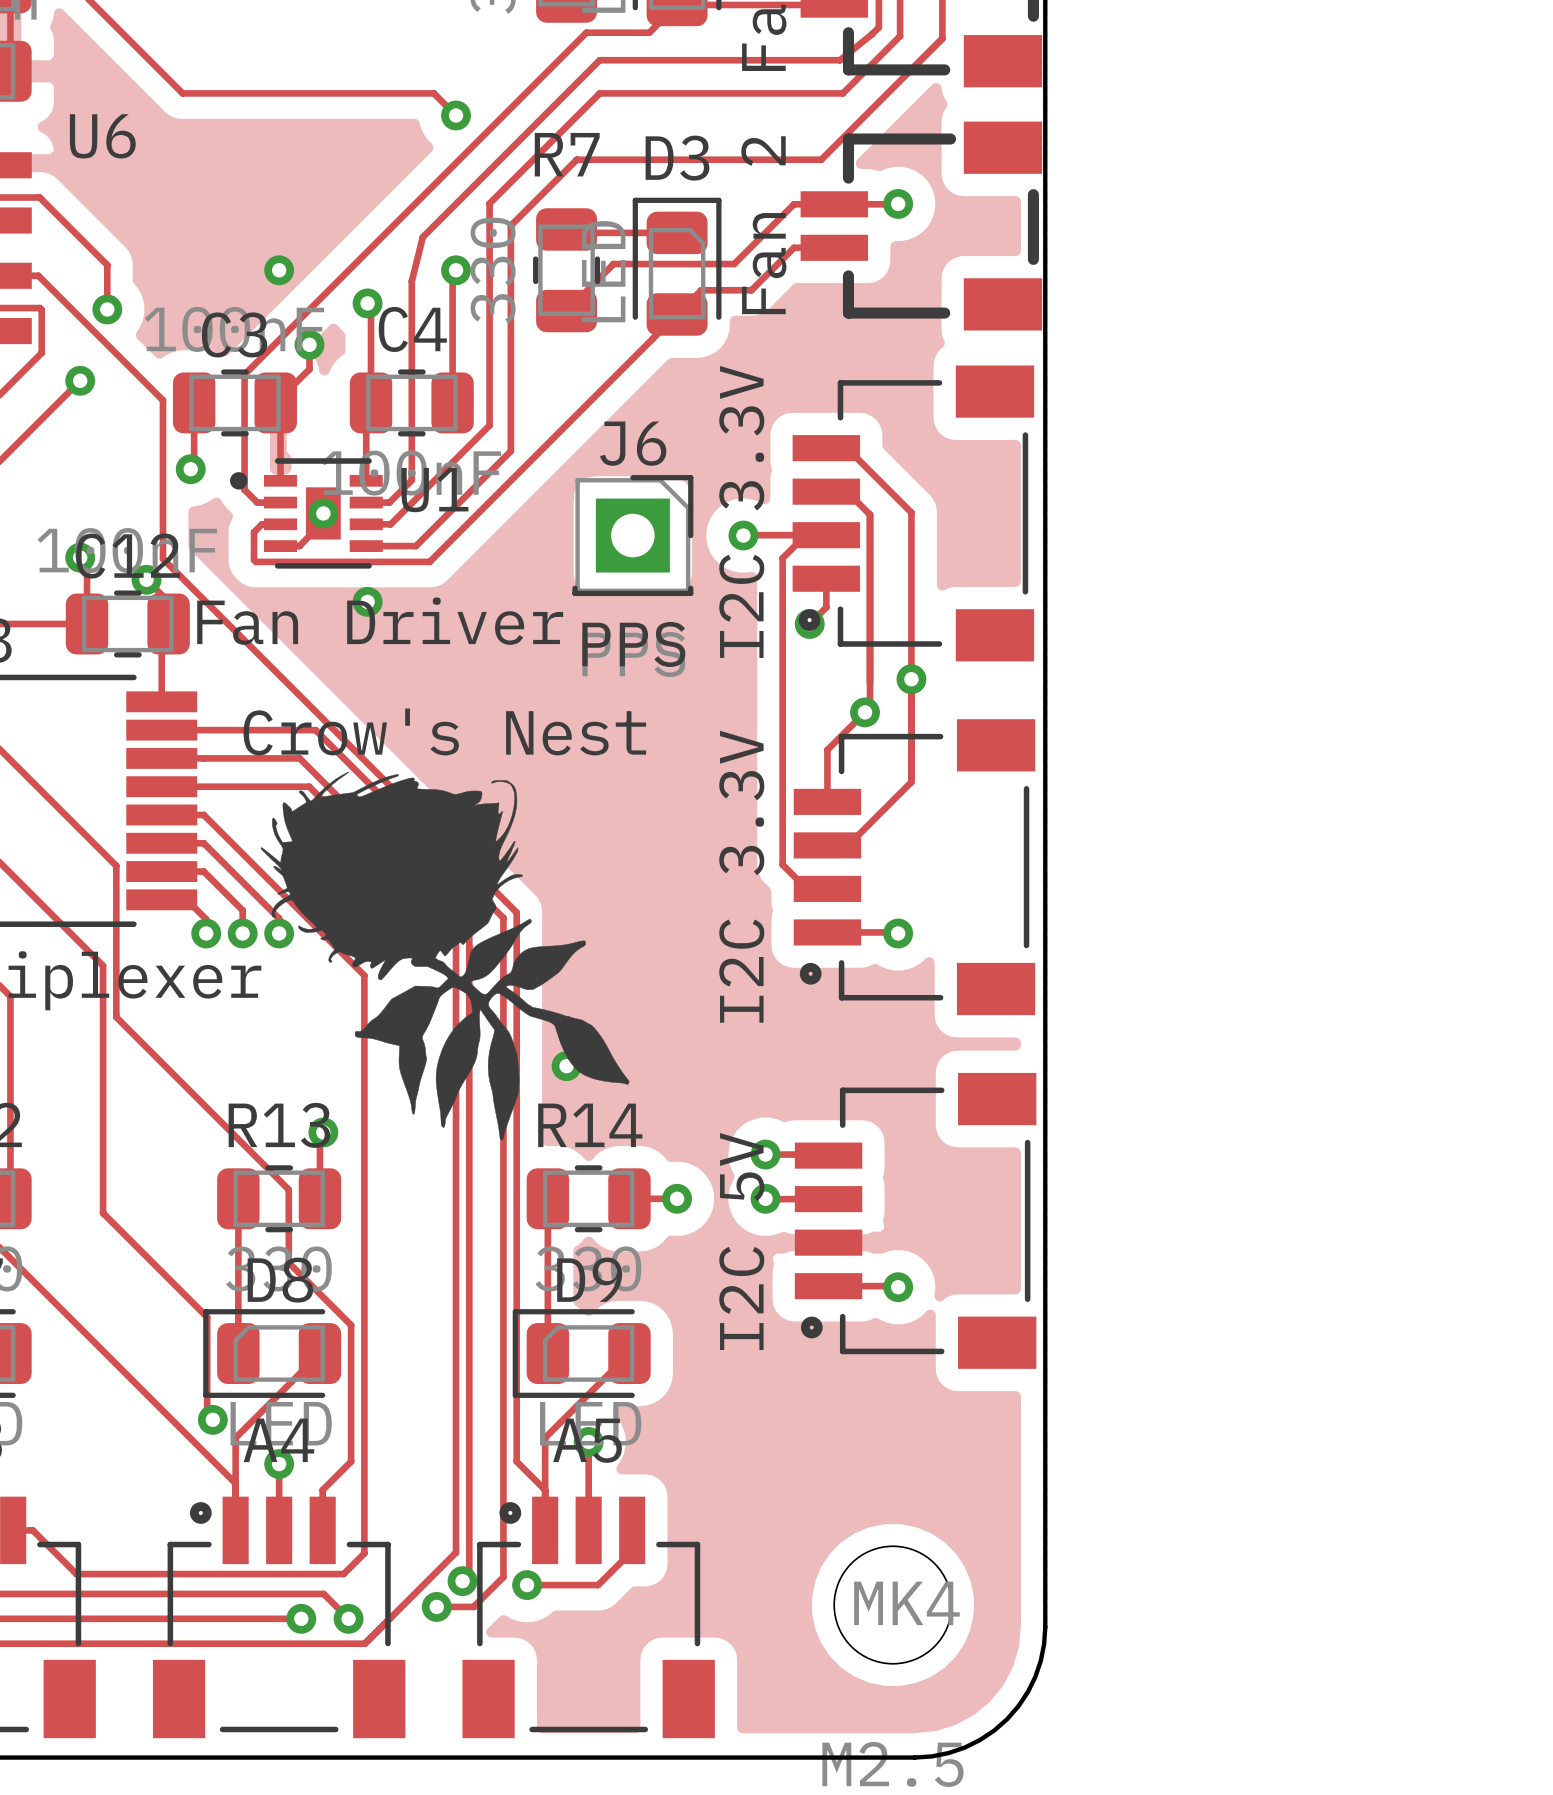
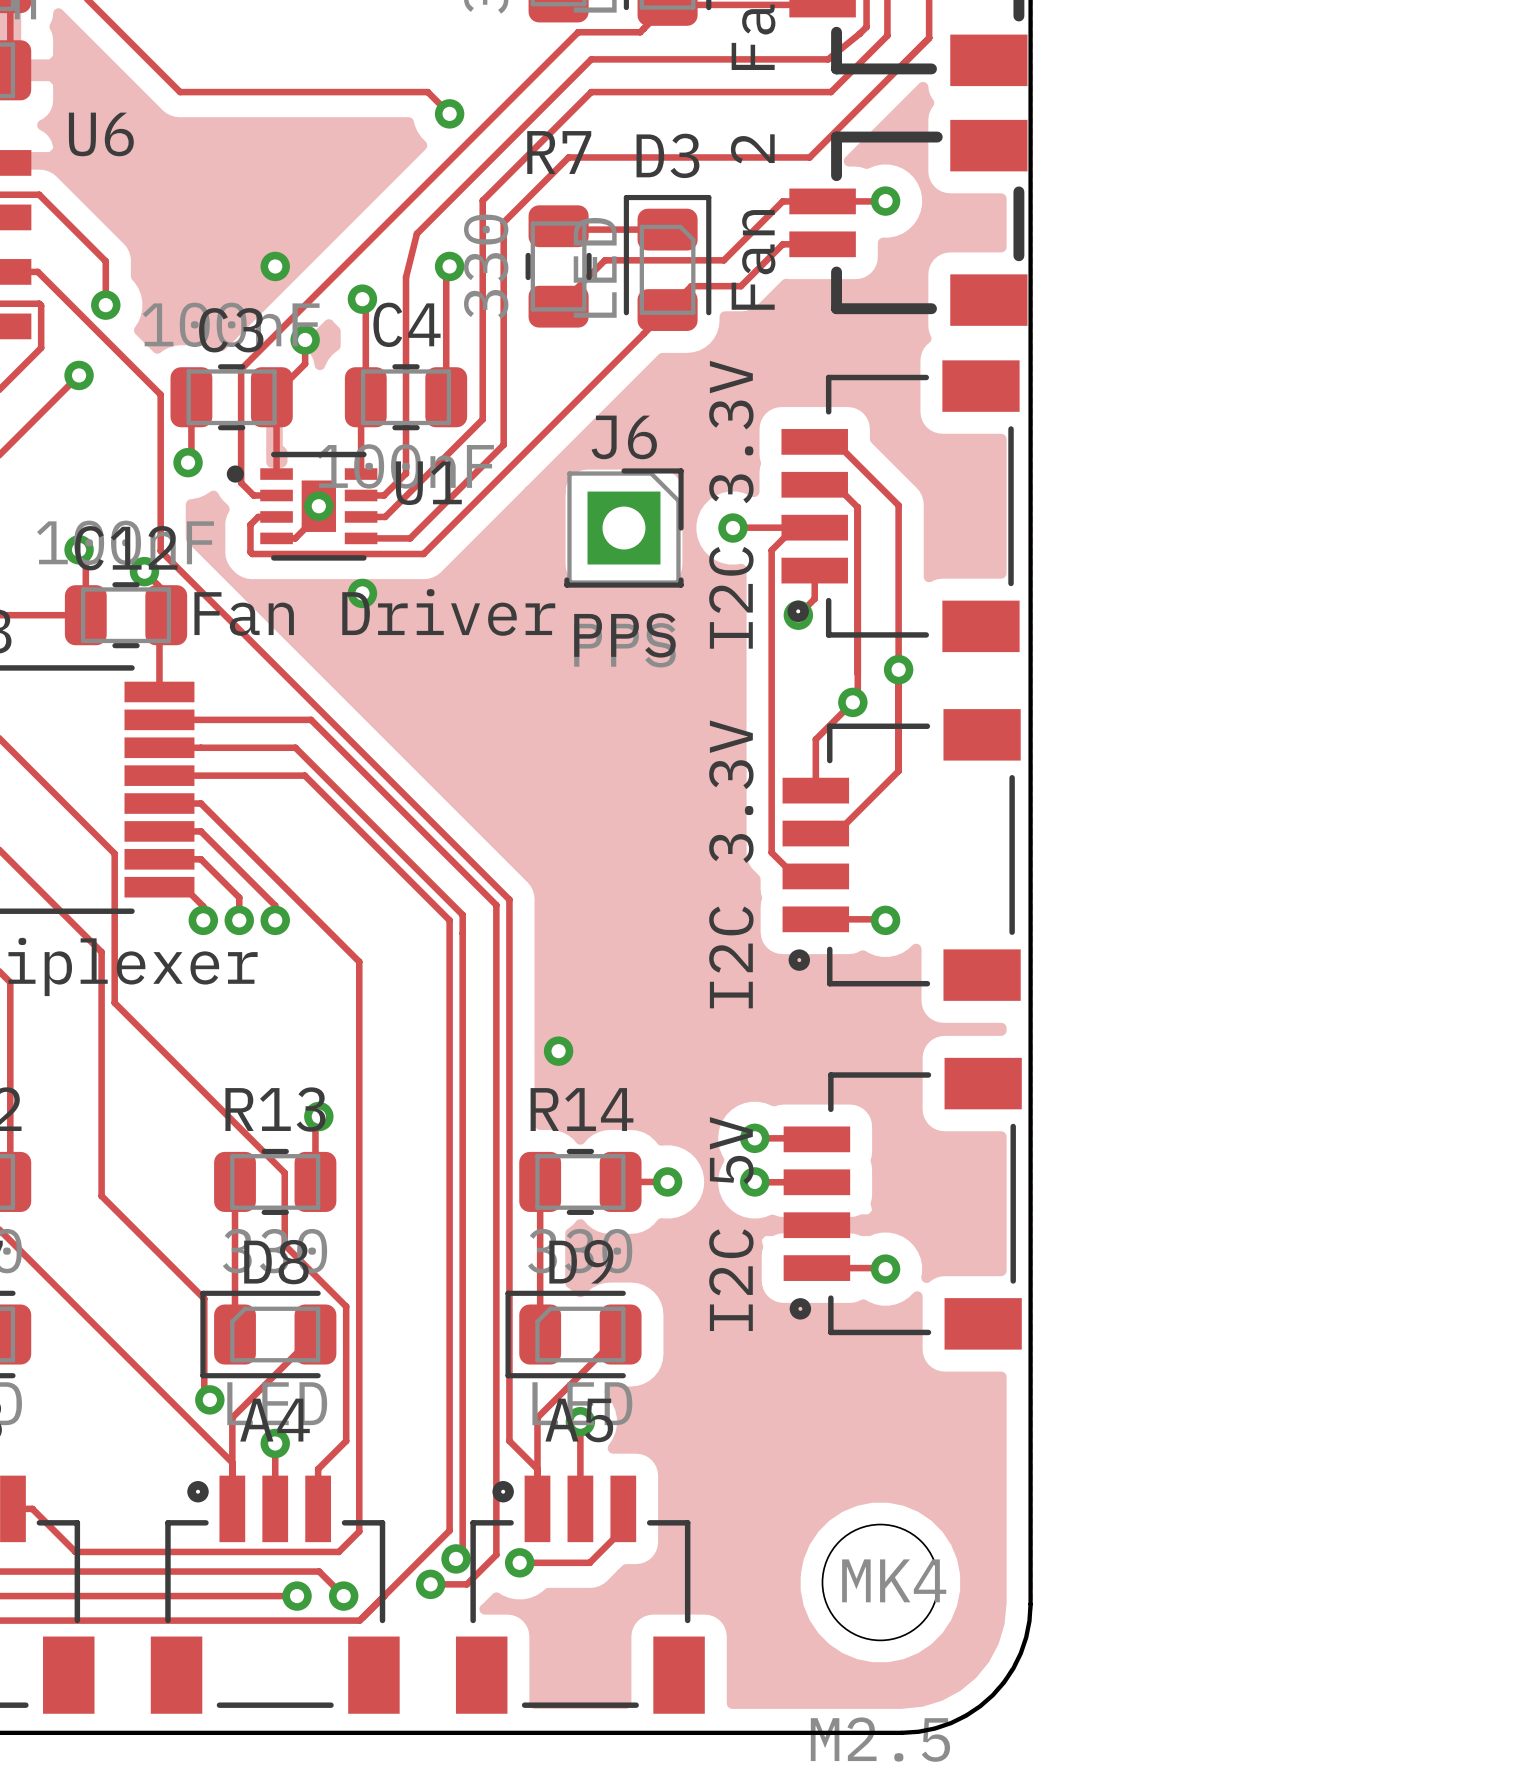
drawing: [260, 771, 630, 1141] -> none

